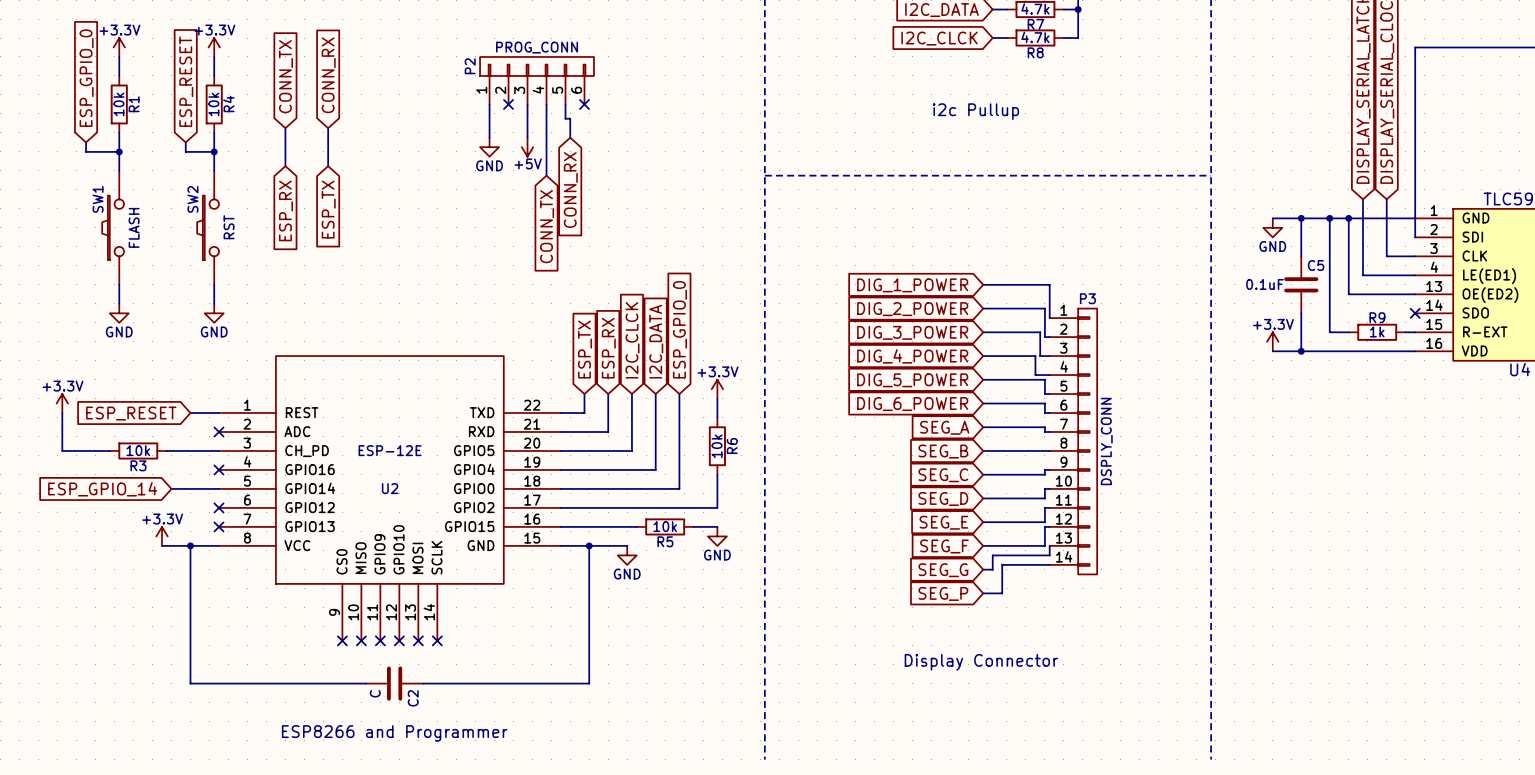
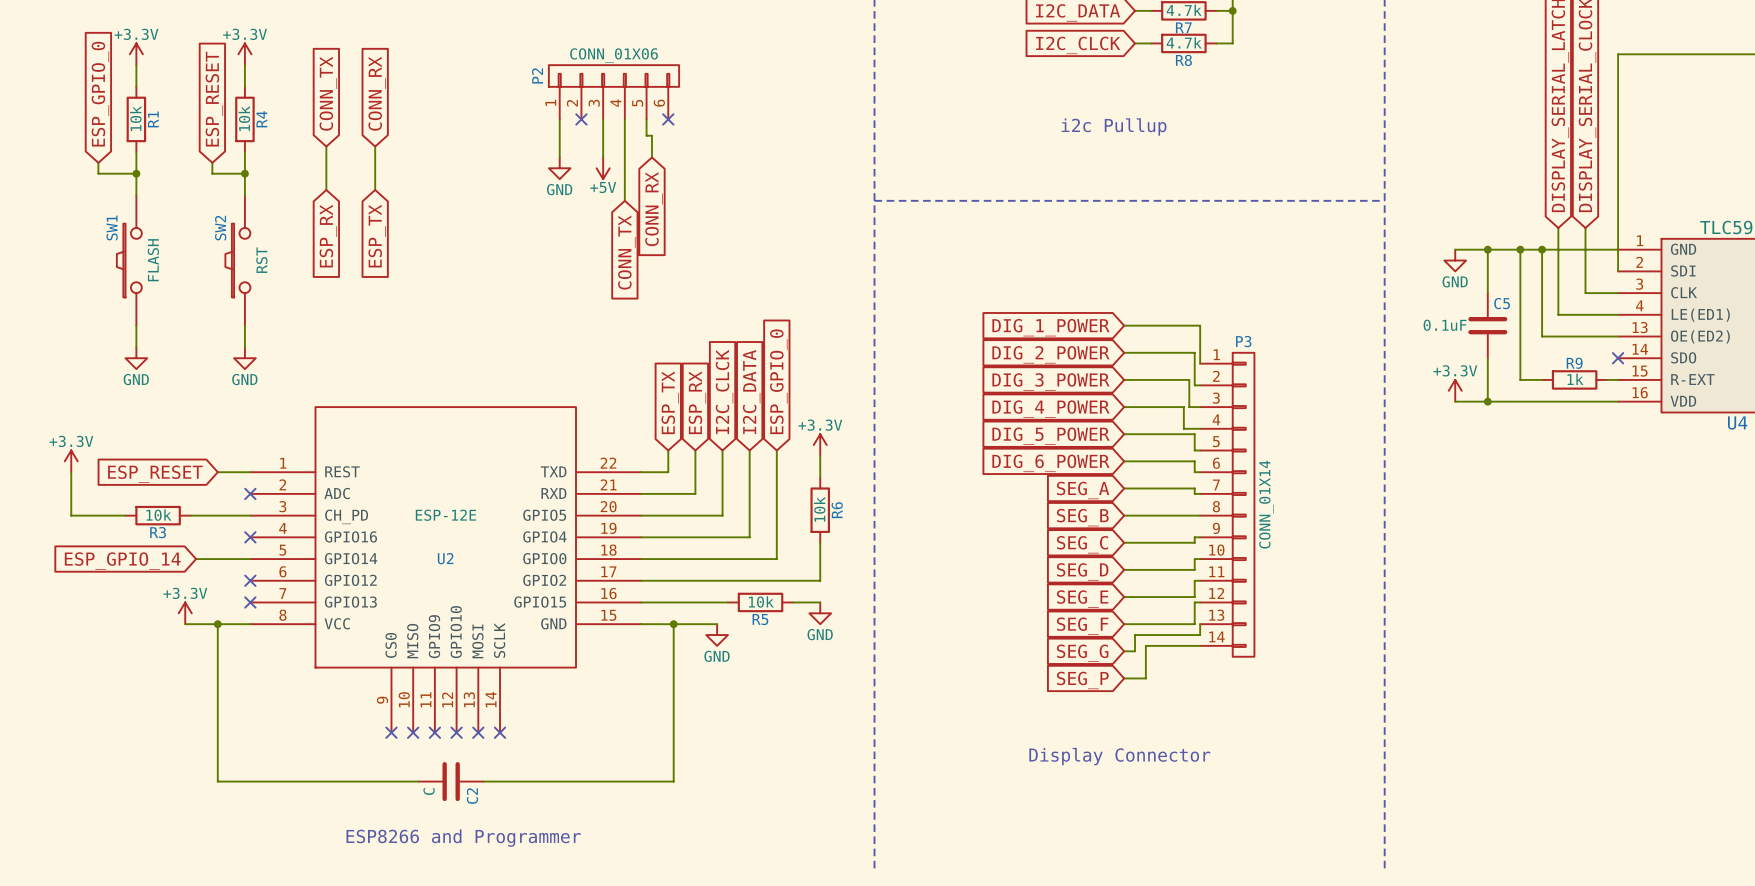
P2 value: PROG_CONN (537, 47) -> CONN_01X06 (614, 55)
P3 value: DSPLY_CONN (1106, 441) -> CONN_01X14 (1266, 504)

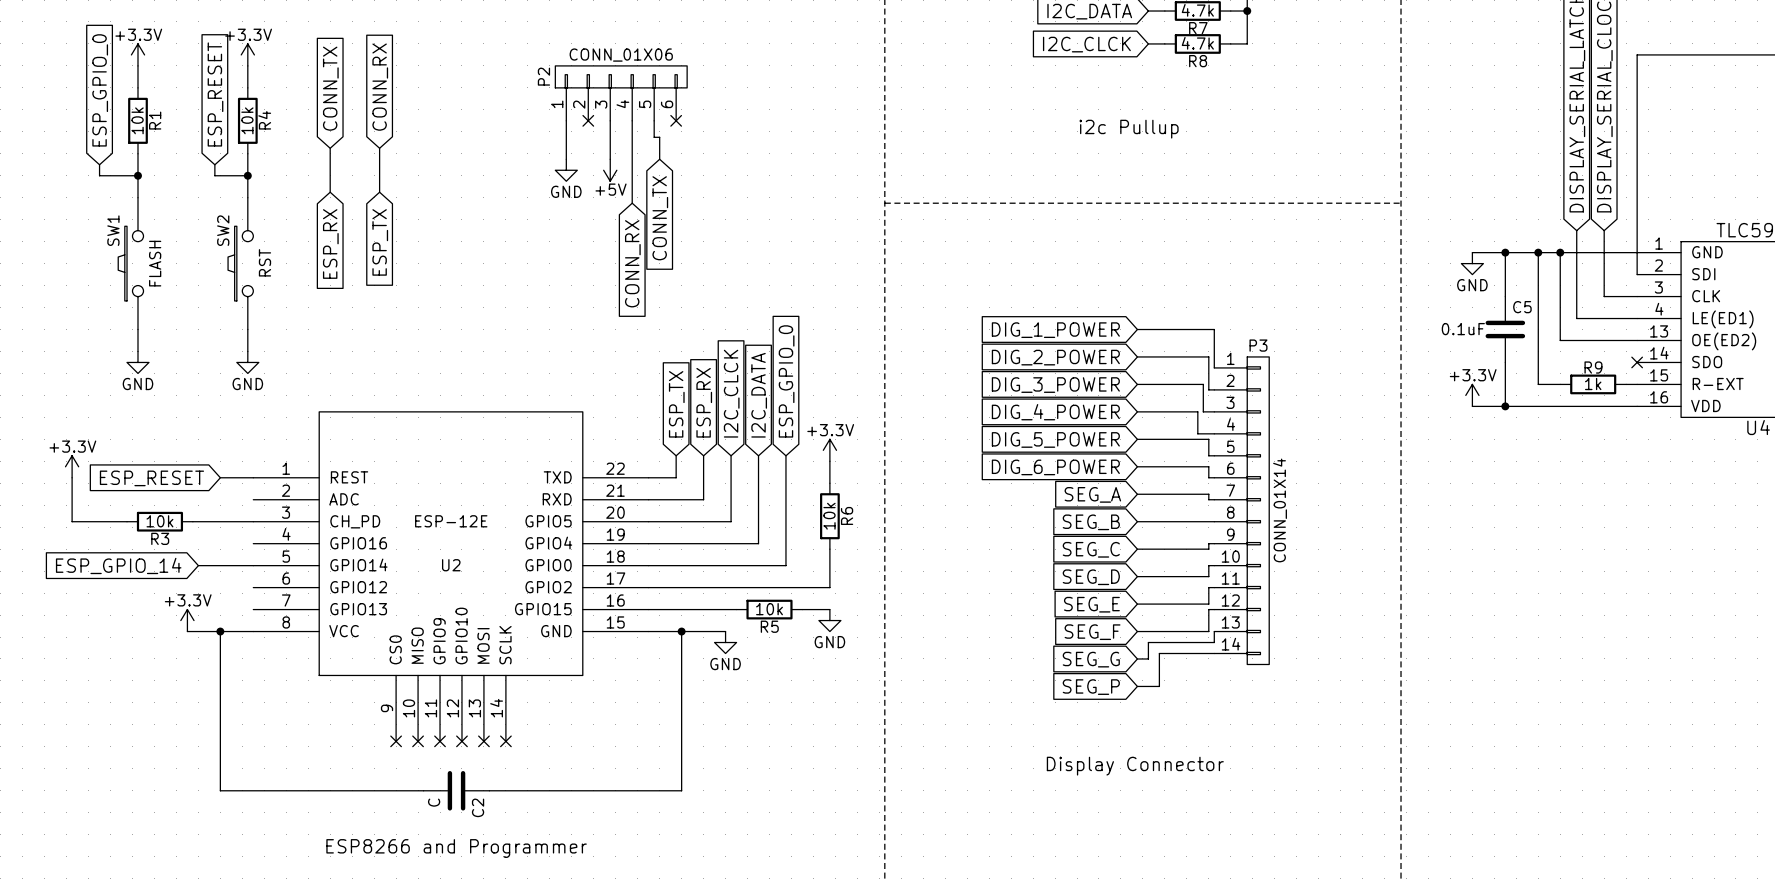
global label: CONN_RX (653, 209) -> CONN_TX (660, 218)
global label: CONN_TX (626, 252) -> CONN_RX (632, 263)
no-connect mark: (250, 493) -> none
no-connect mark: (250, 537) -> none
no-connect mark: (250, 580) -> none
no-connect mark: (250, 602) -> none

